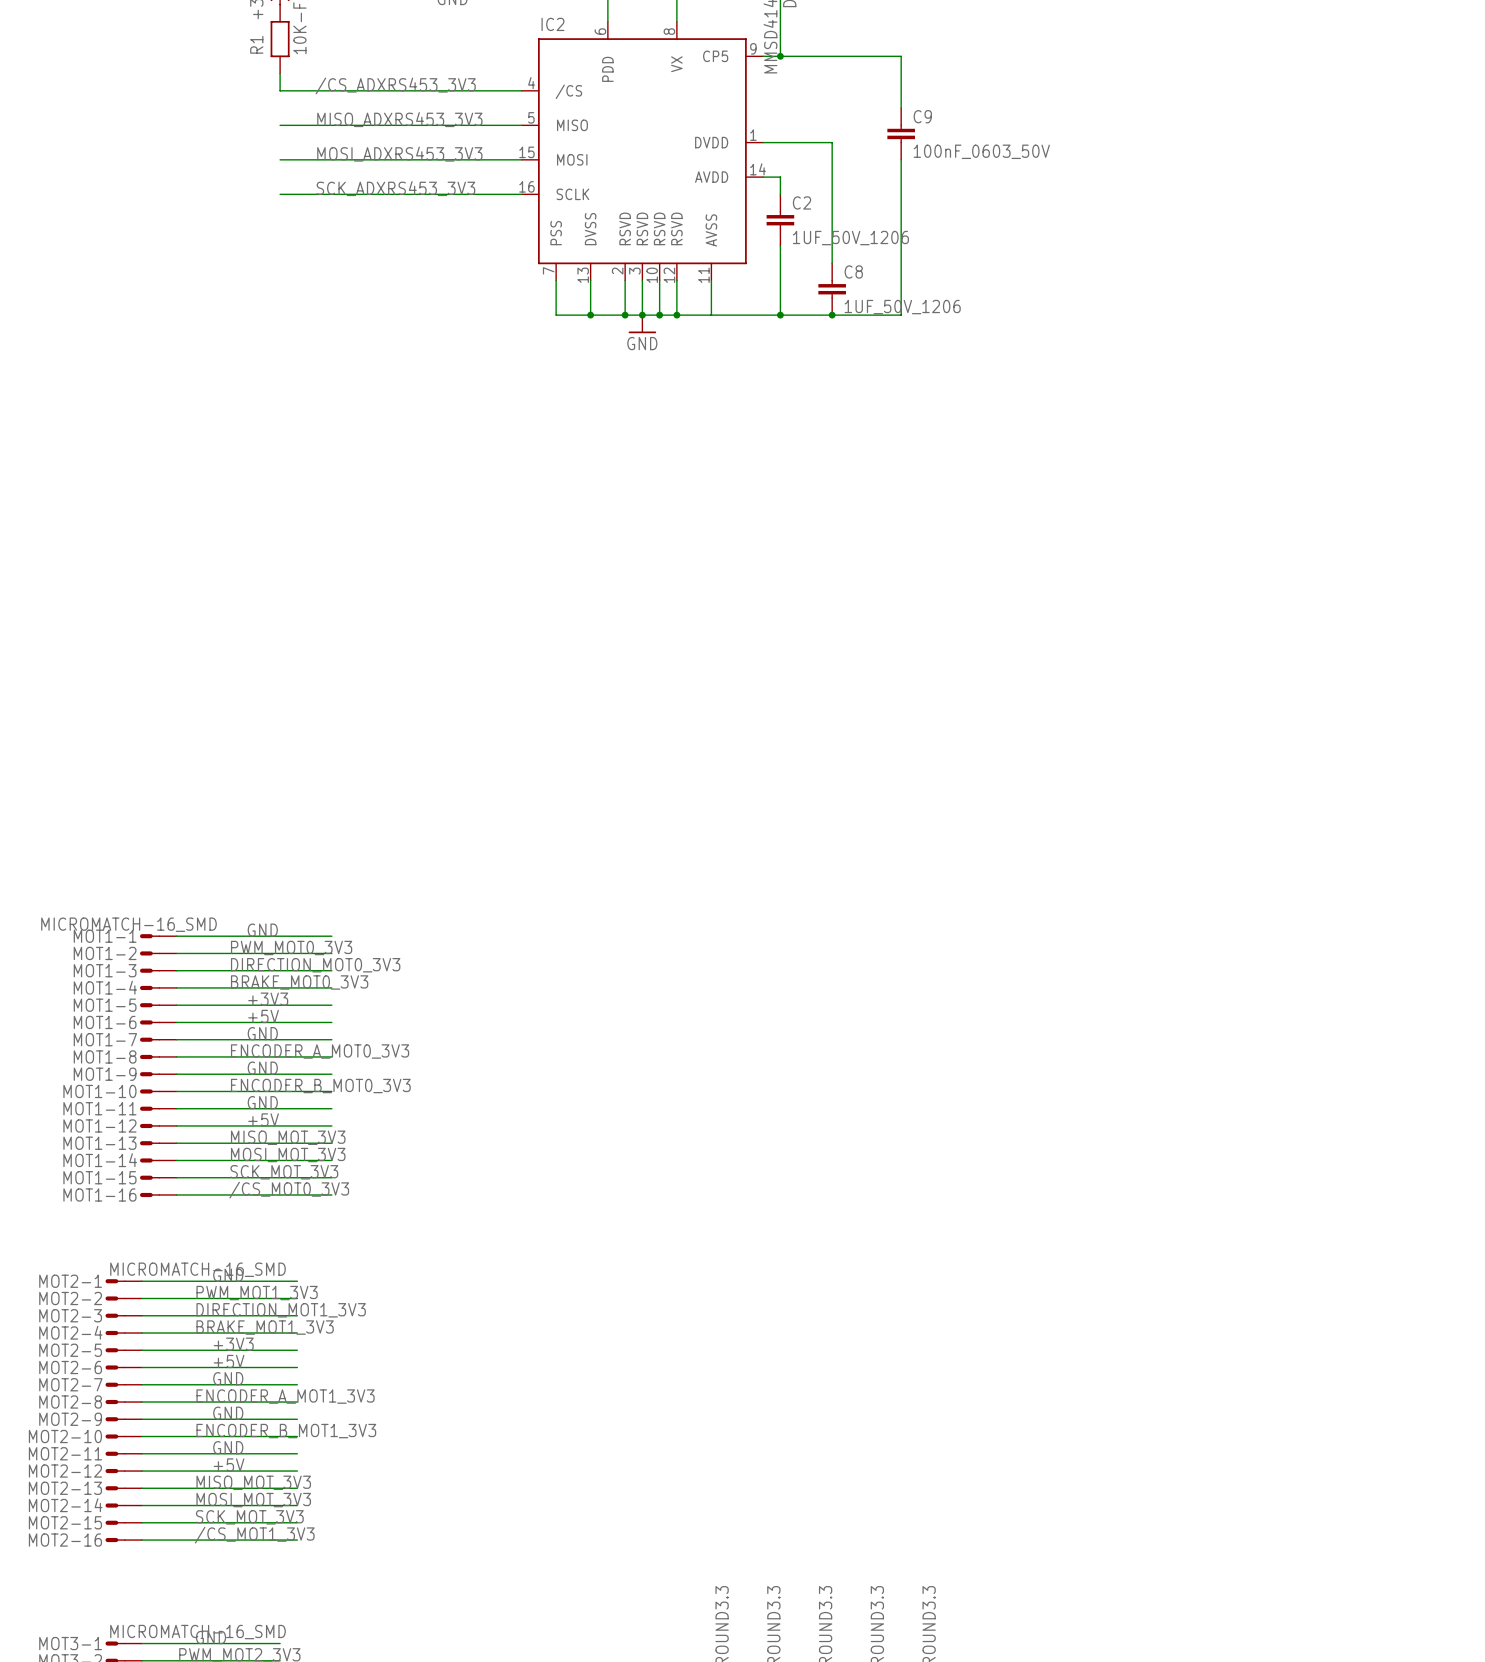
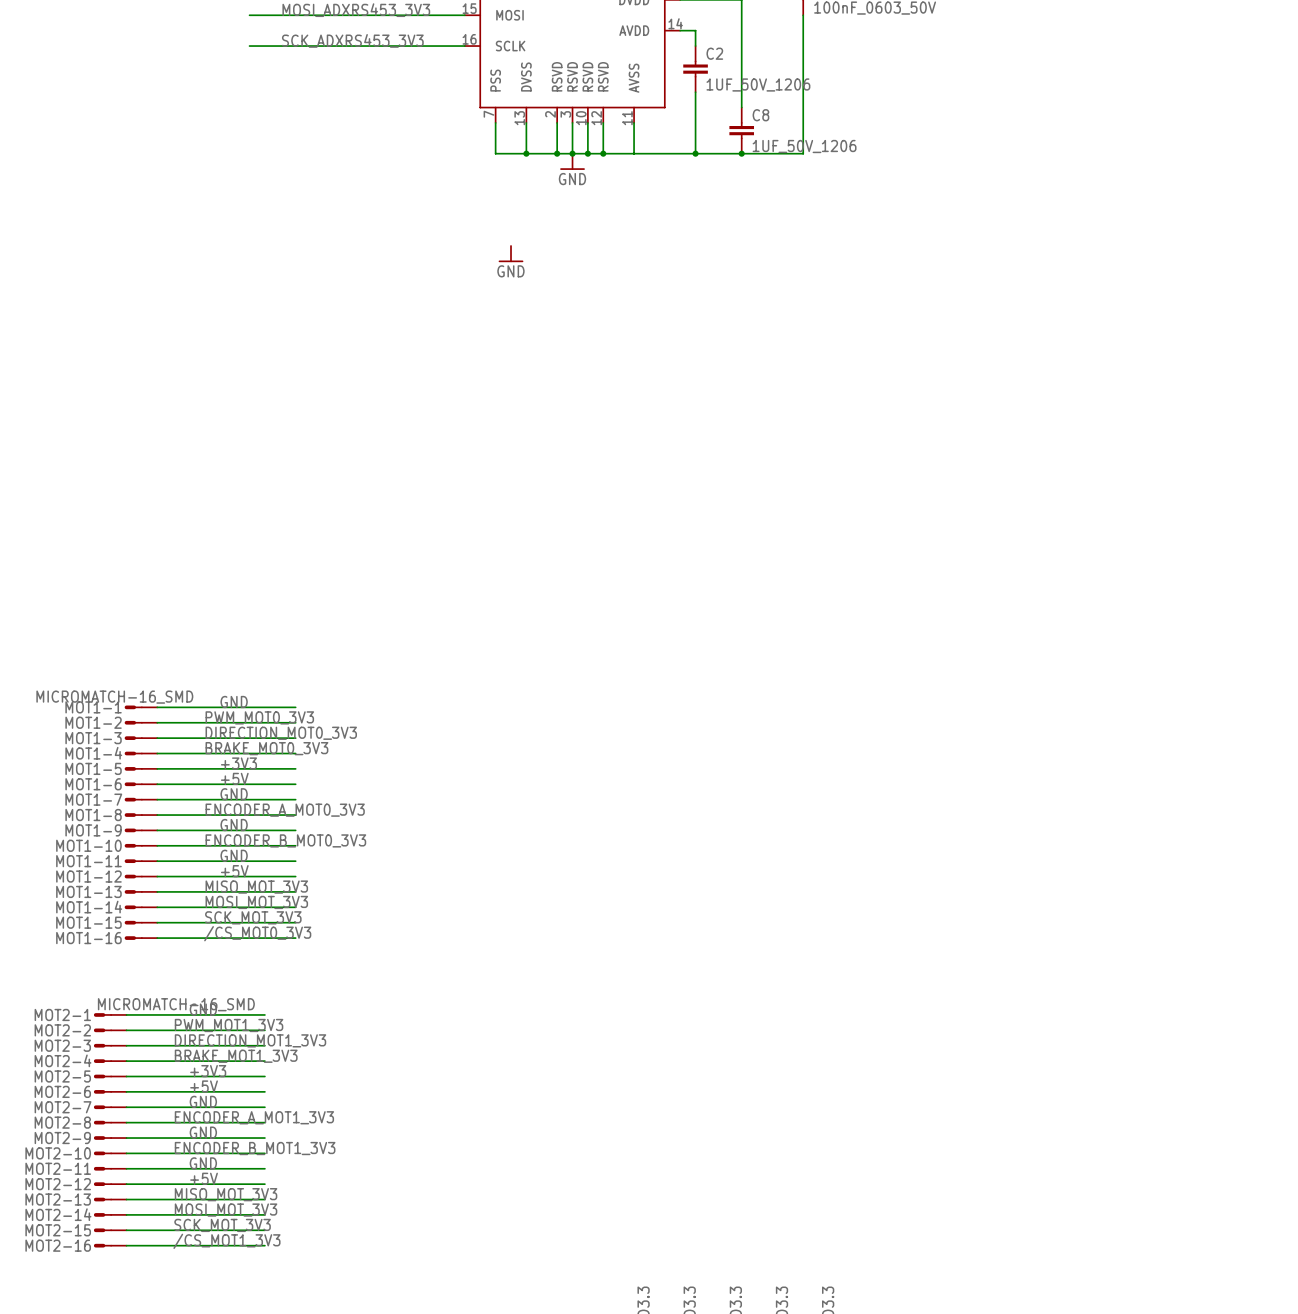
power symbol: none -> GND (511, 254)

